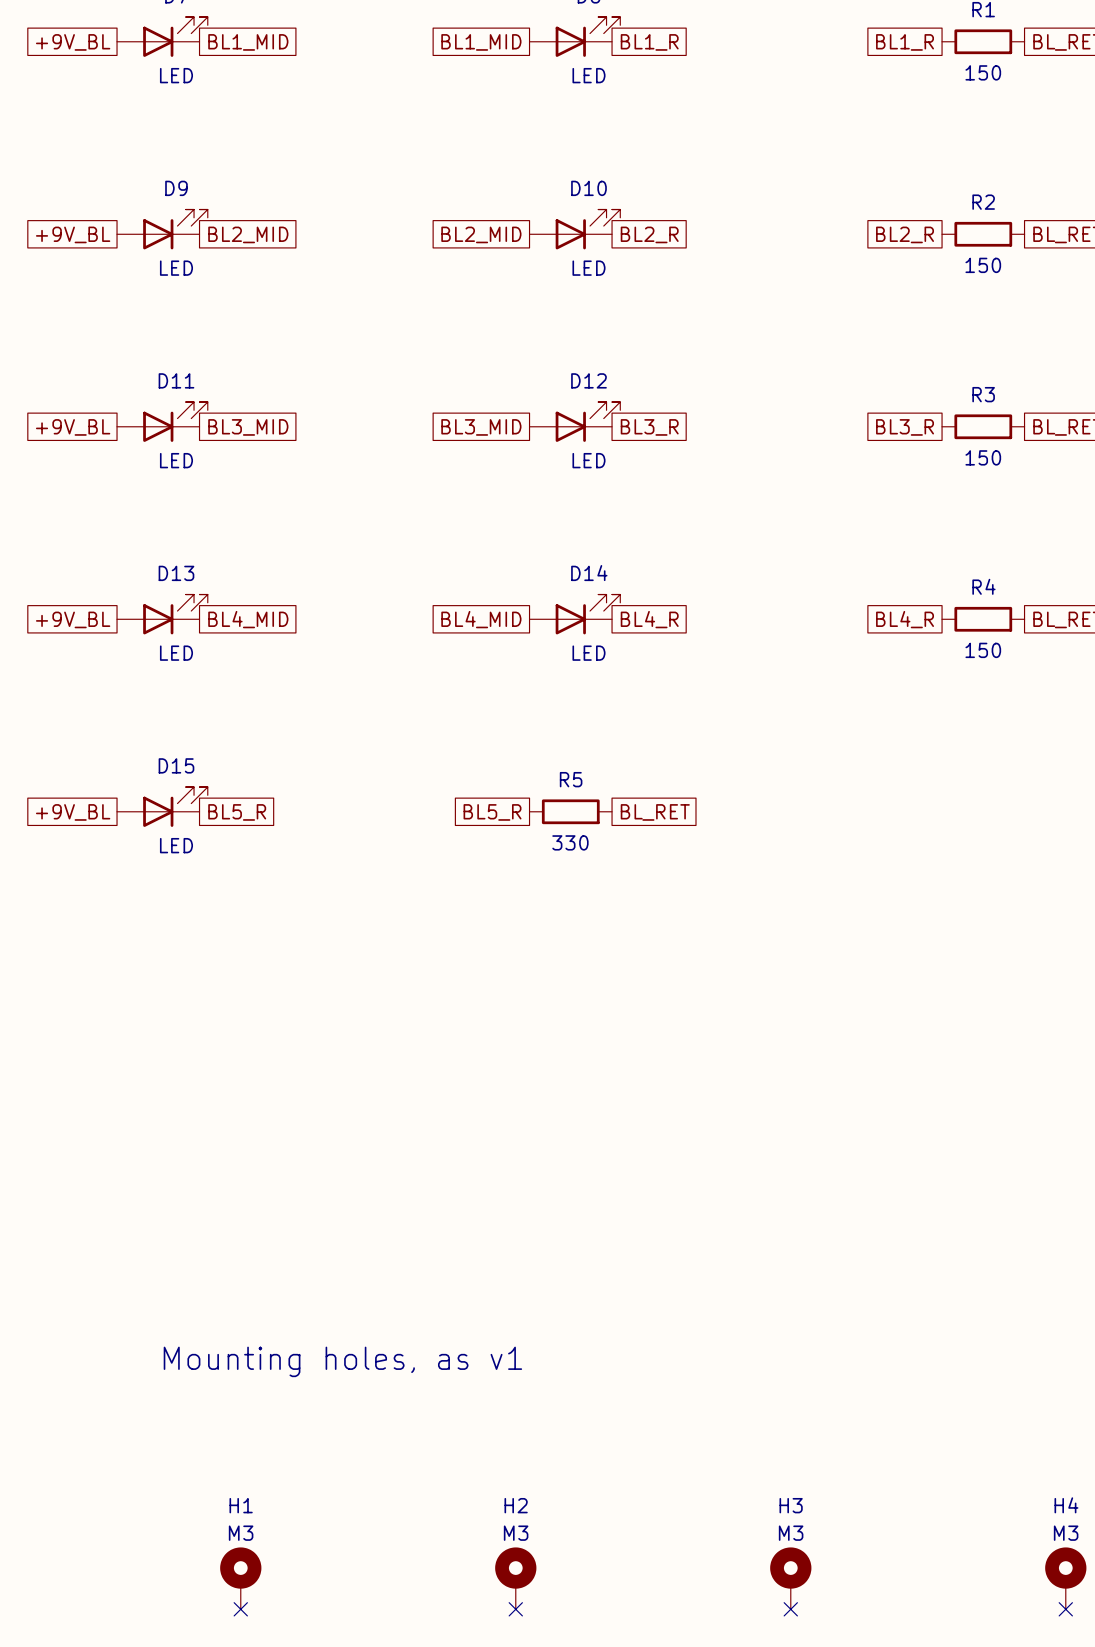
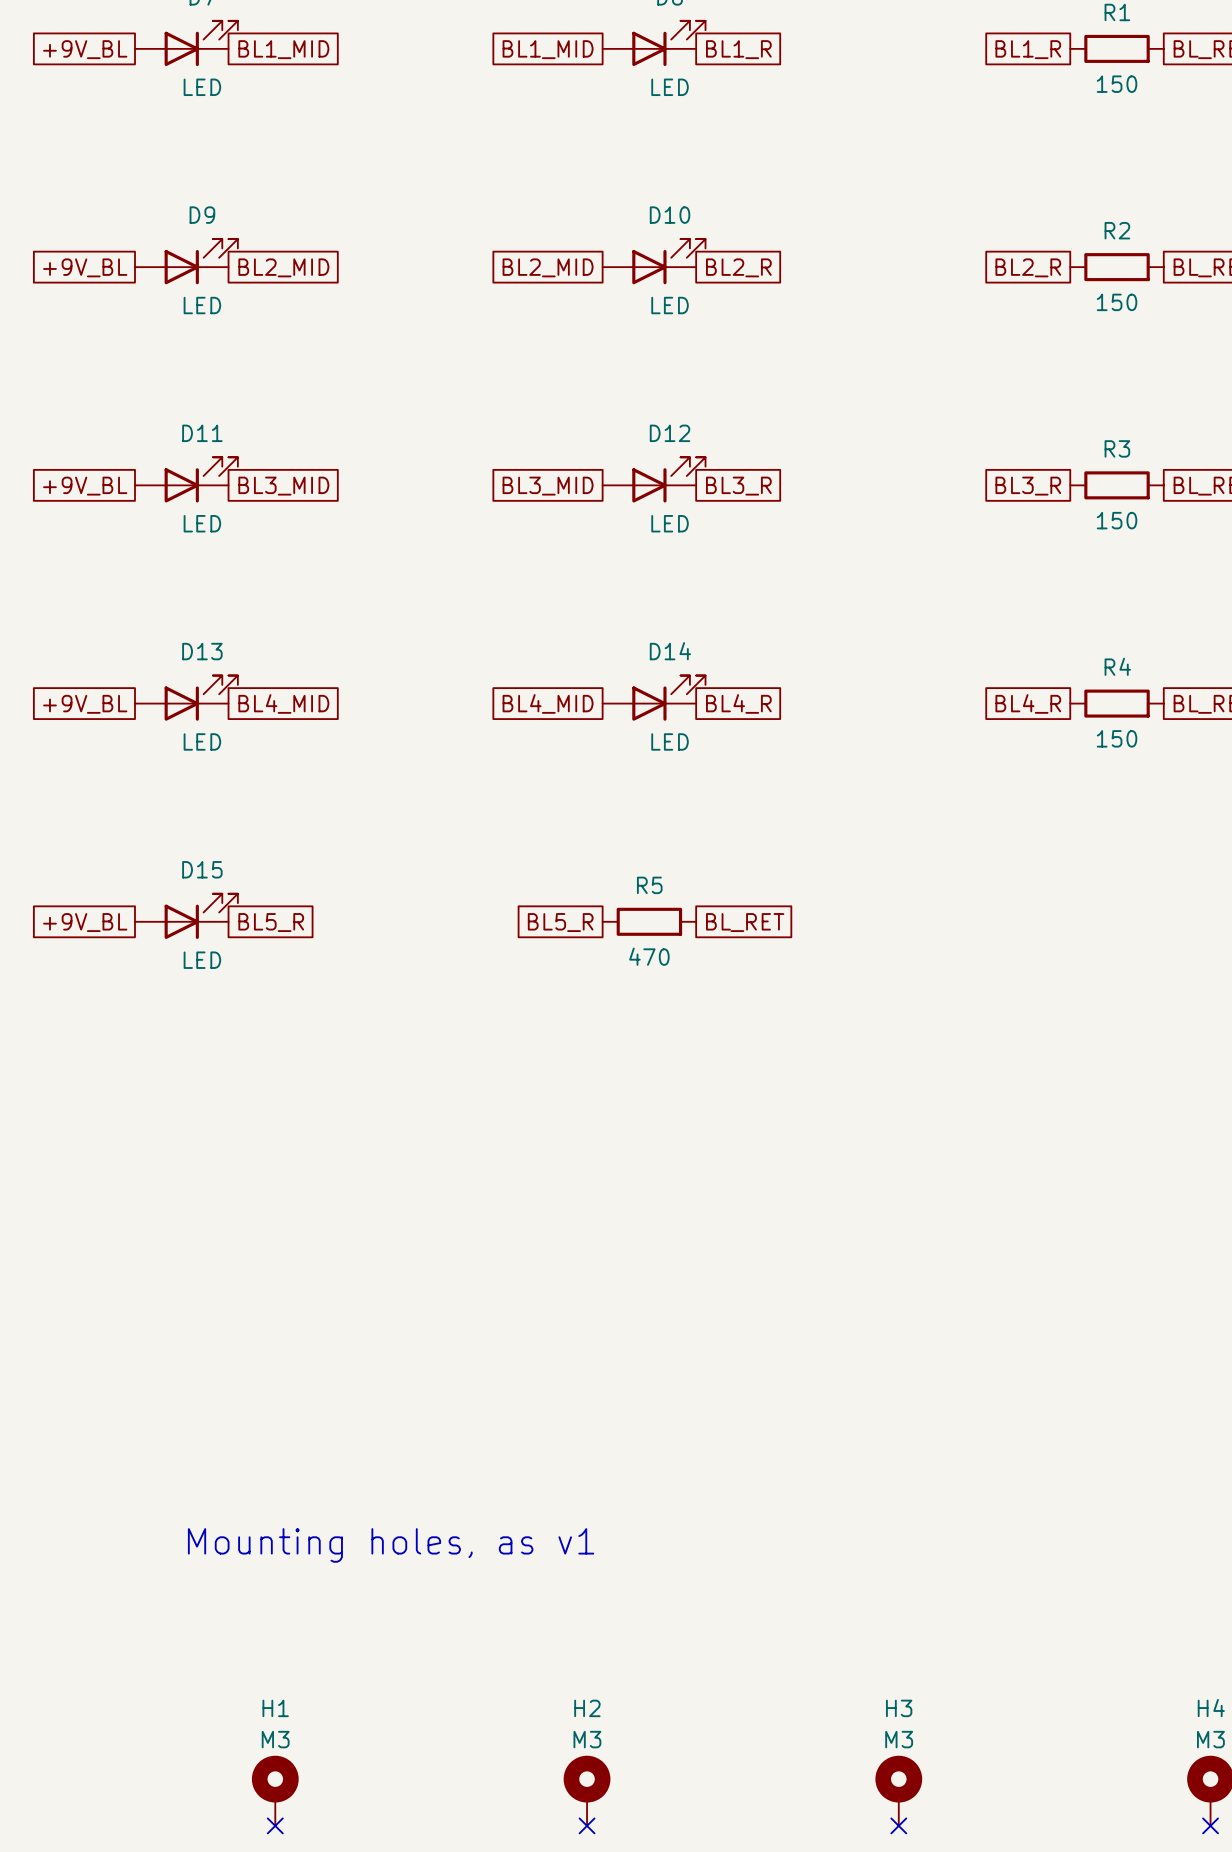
R5 value: 330 (570, 842) -> 470 (649, 956)

